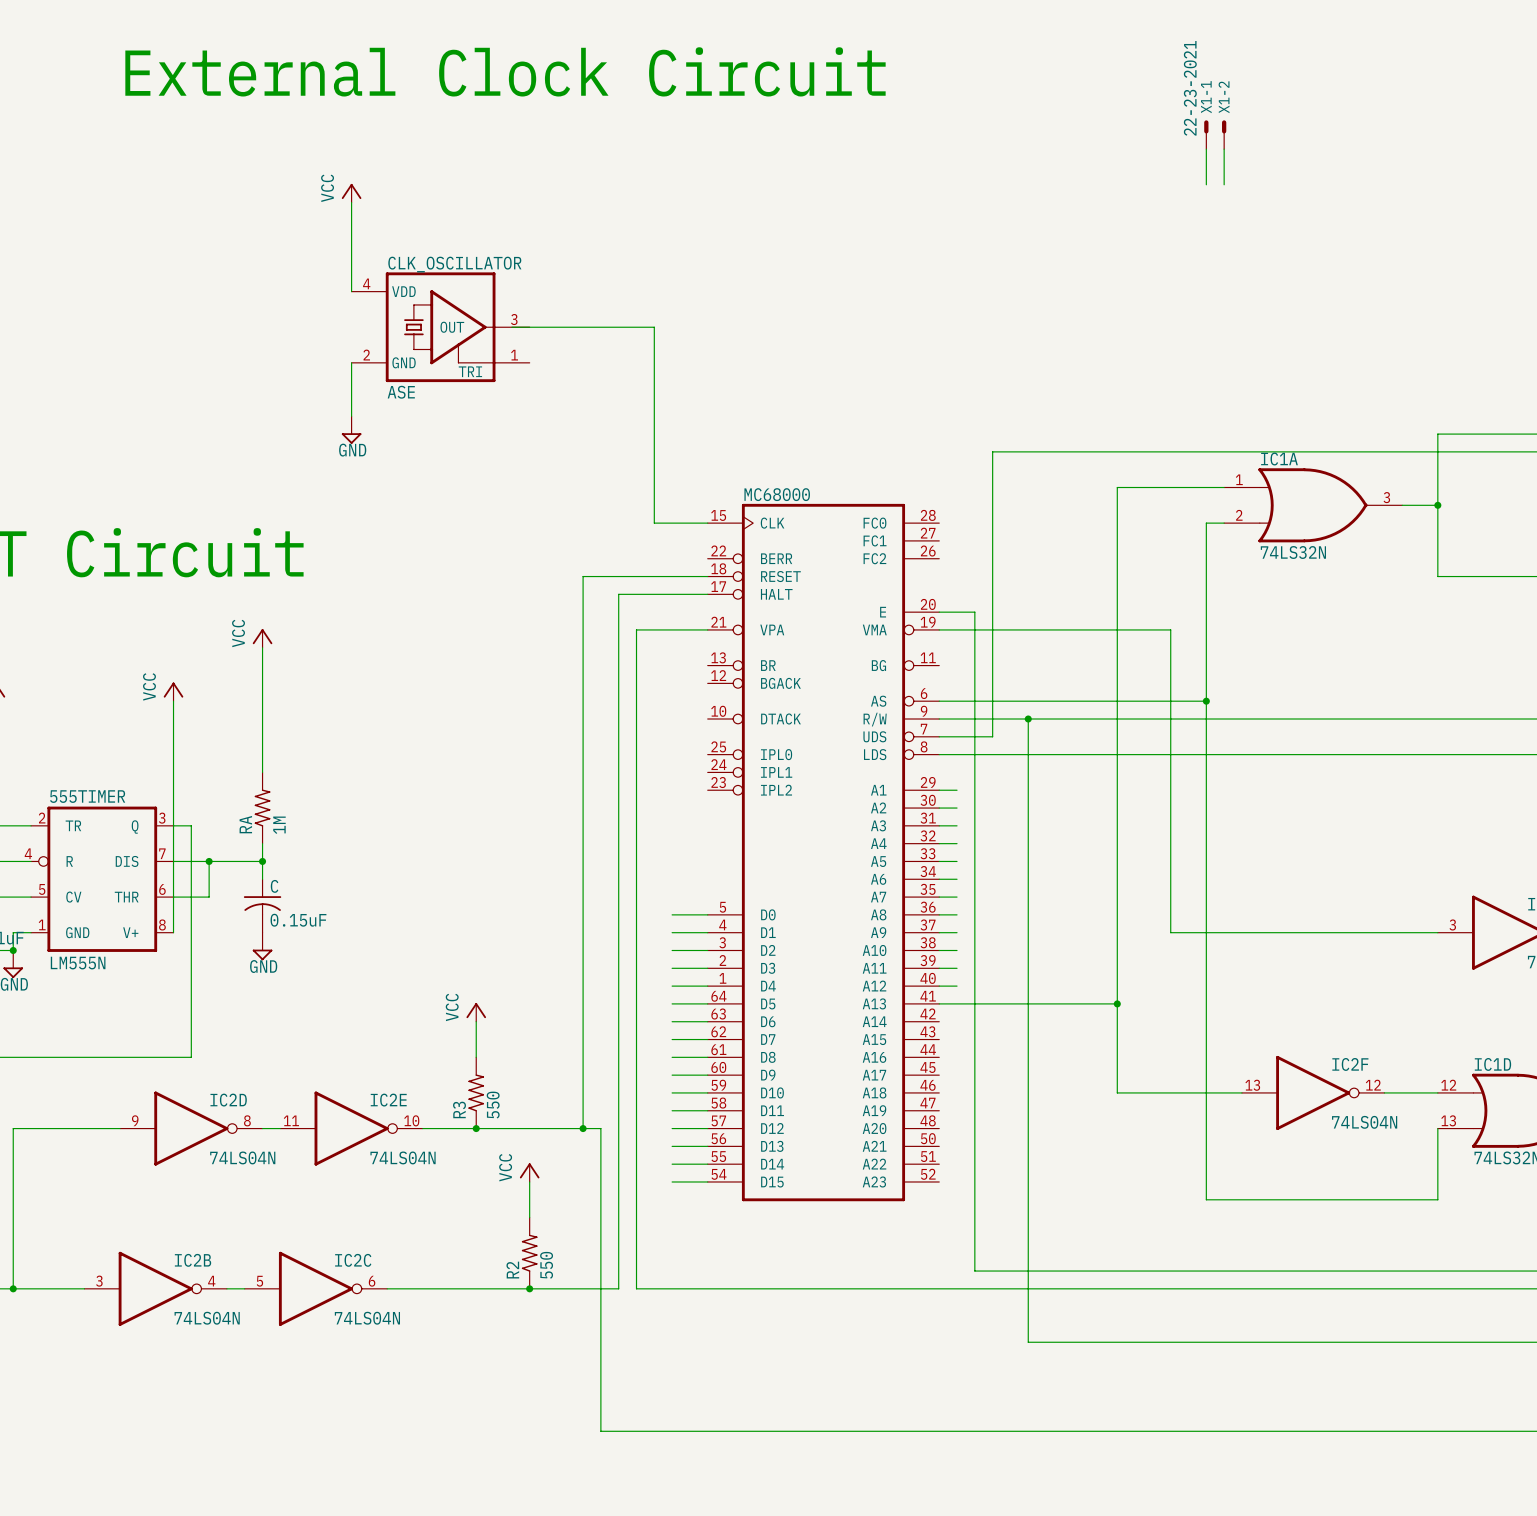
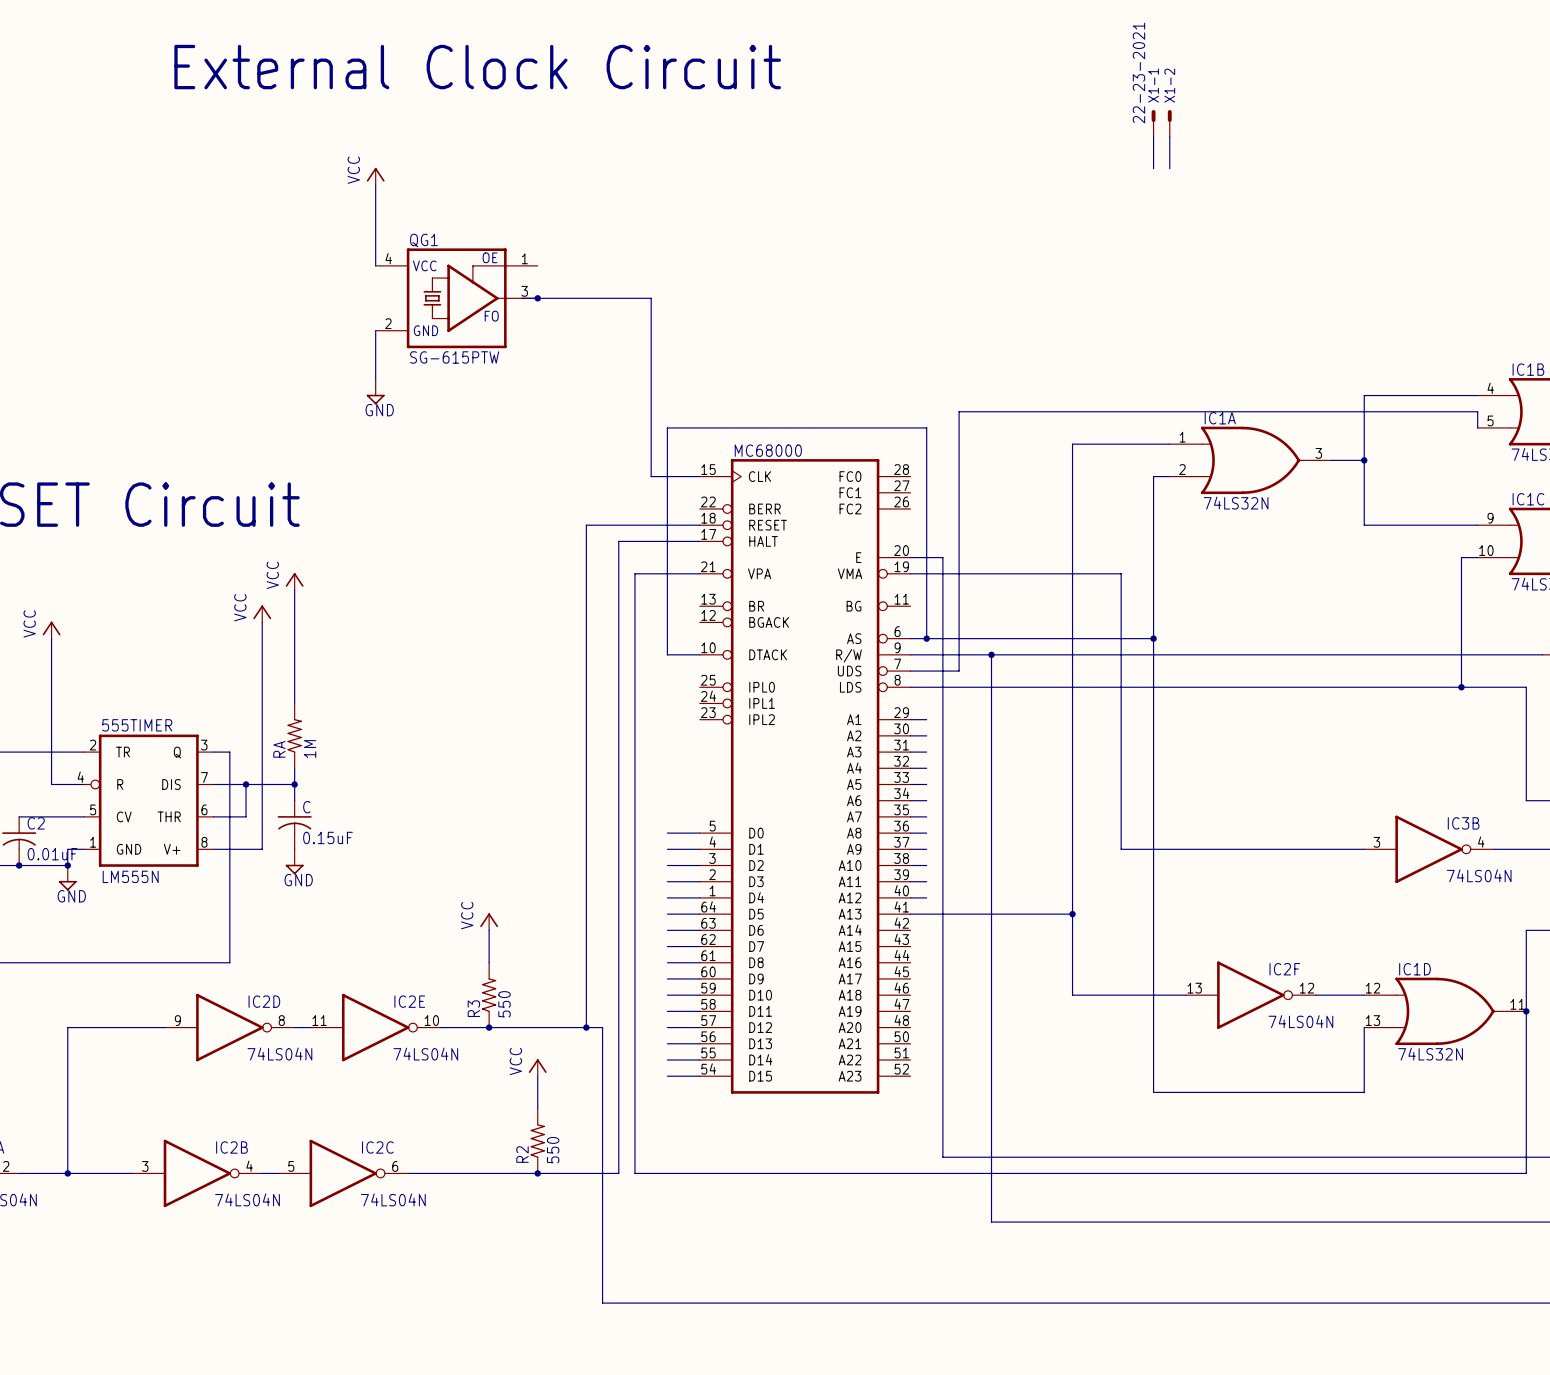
CLK_OSCILLATOR: ASE (440, 327) -> none
QG1: none -> SG-615PTW (456, 298)
junction: none -> (537, 298)
power symbol position: VCC (173, 691) -> VCC (262, 613)
wire: (173, 701) (173, 932) -> (262, 622) (262, 849) (213, 849)
wire: none -> (926, 638) (926, 427) (667, 427) (667, 654) (699, 654)
junction: none -> (926, 638)

